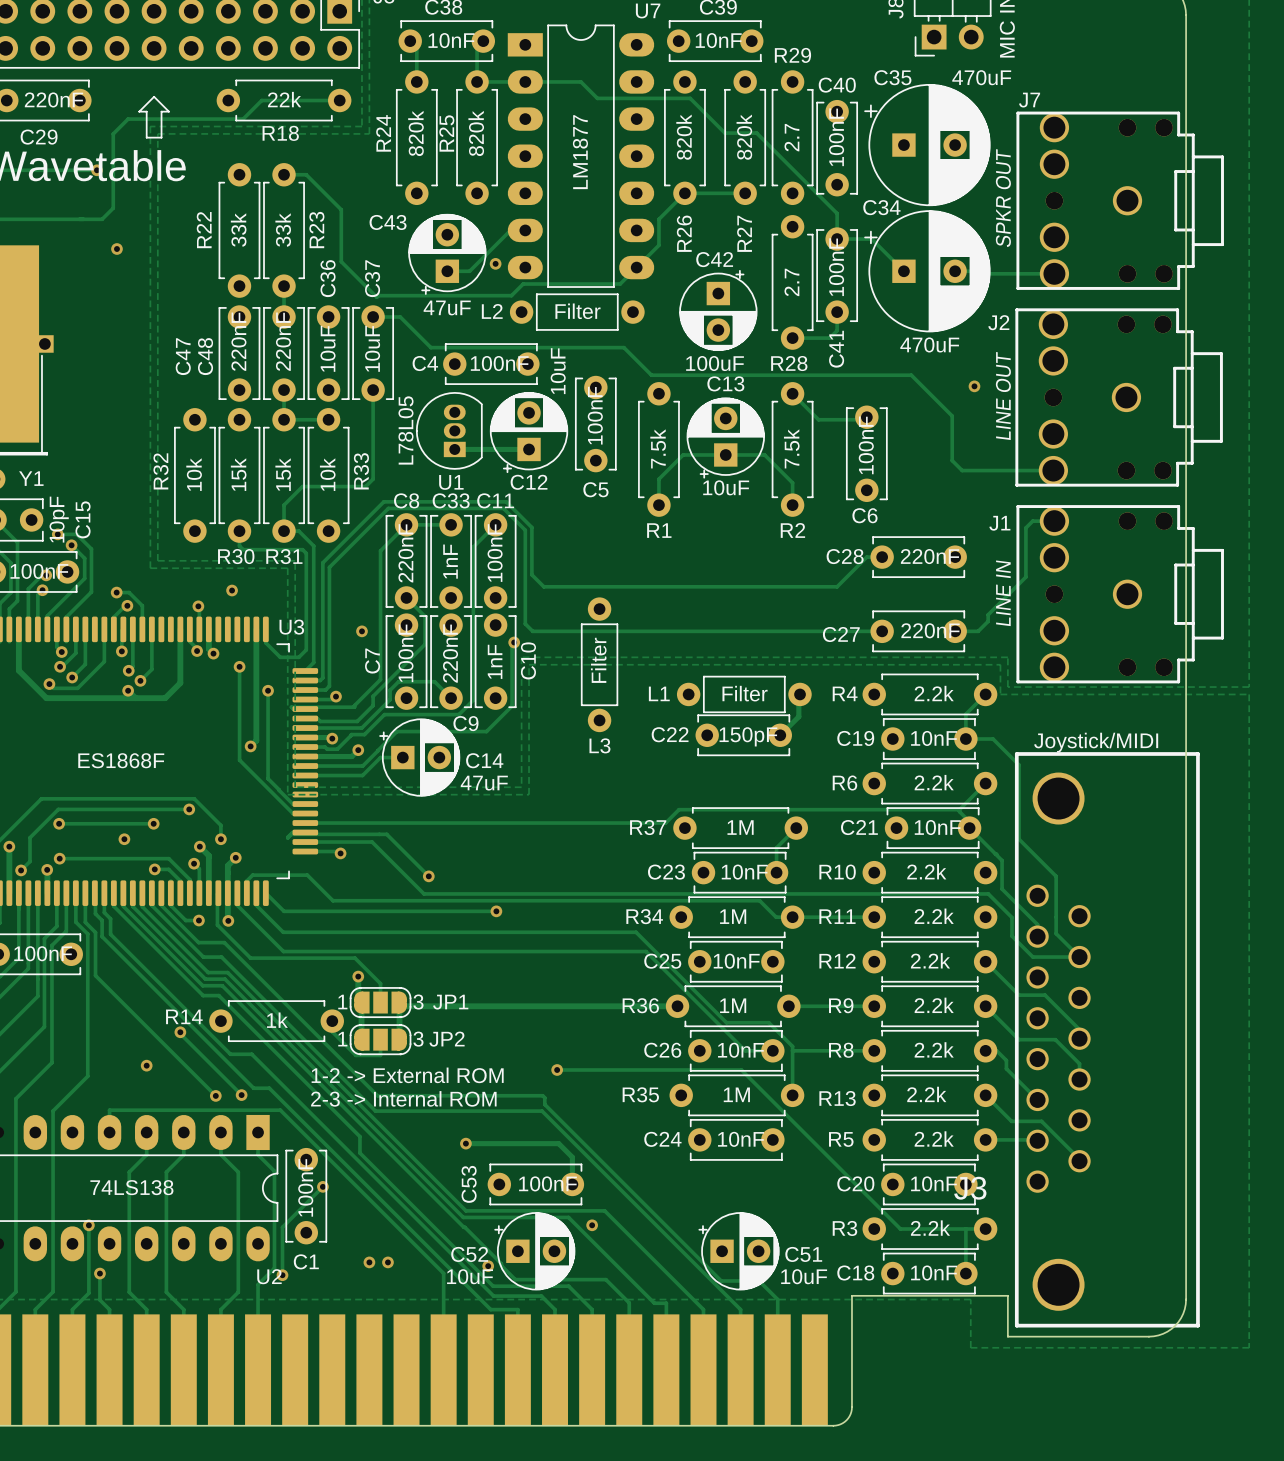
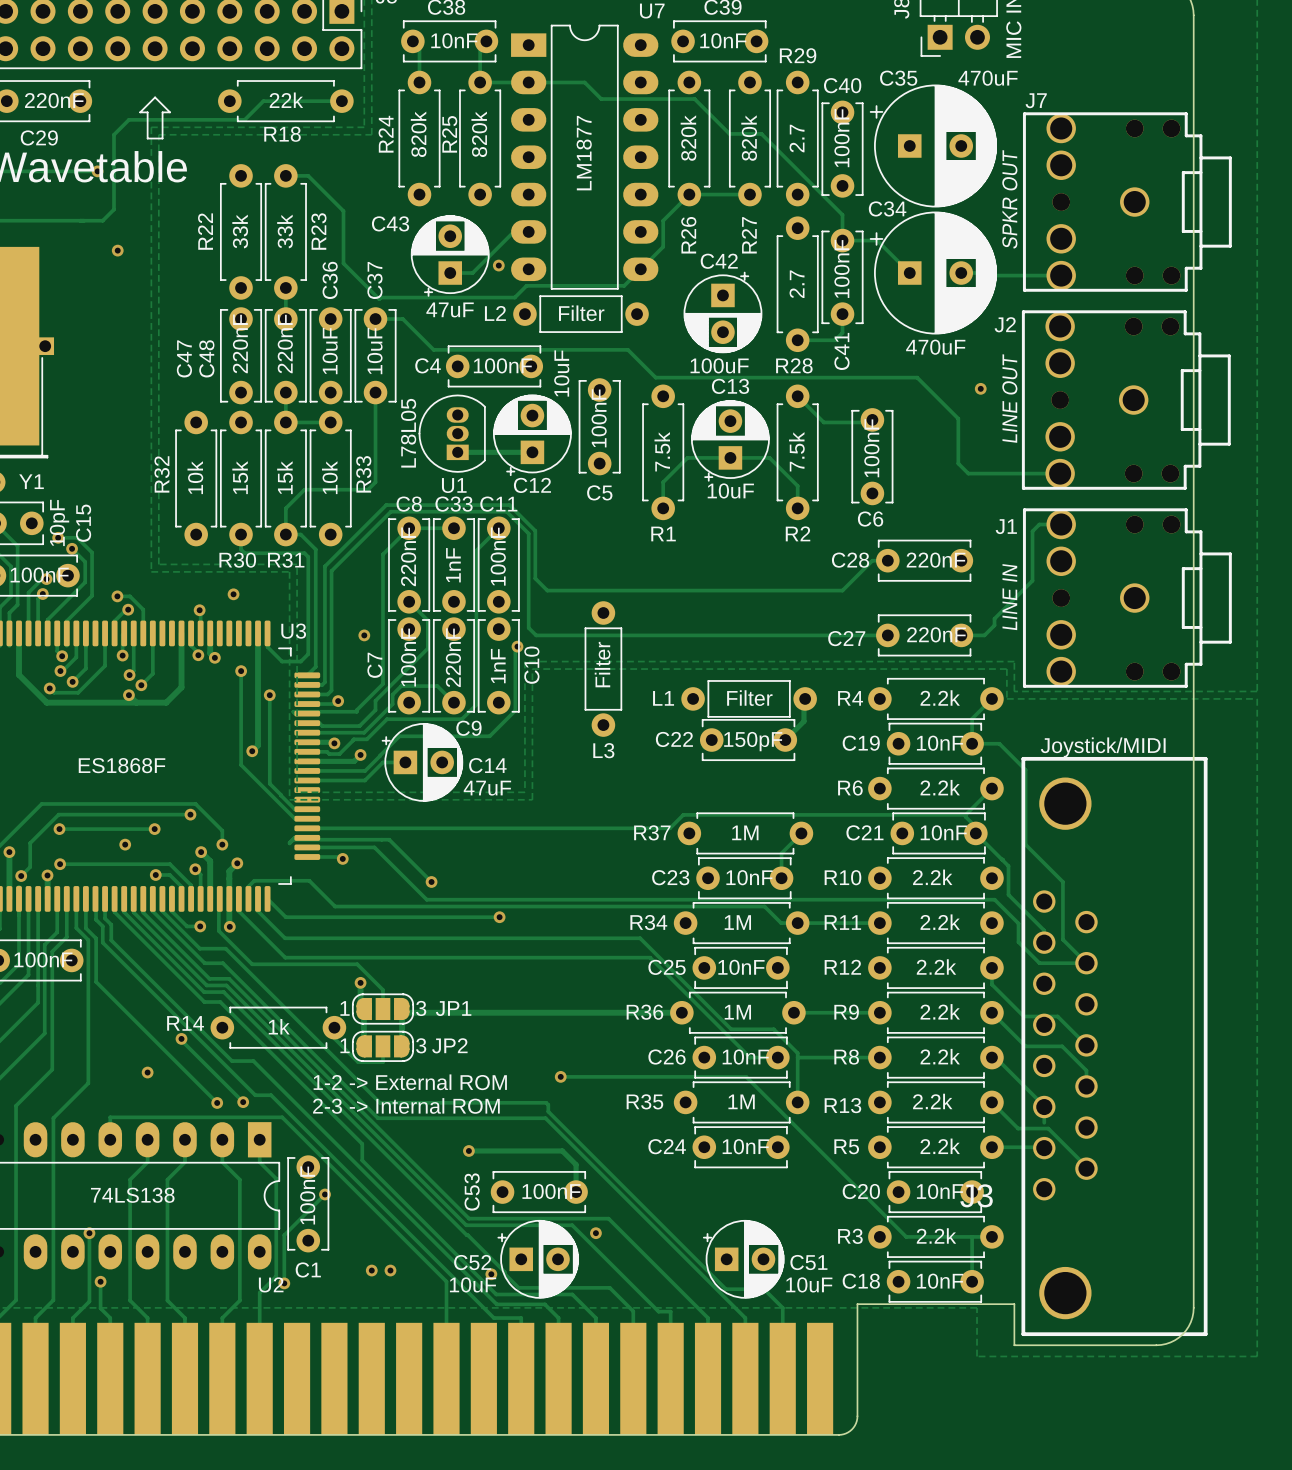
track: (985, 961) (1019, 995) (1045, 995) (1079, 1029) (1079, 1038) -> (991, 967) (991, 984) (1023, 1016) (1057, 1016) (1086, 1045)
track: (989, 1050) (996, 1050) (1006, 1060) (1006, 1068) (1037, 1099) -> (995, 1057) (1044, 1106) (1044, 1122)

